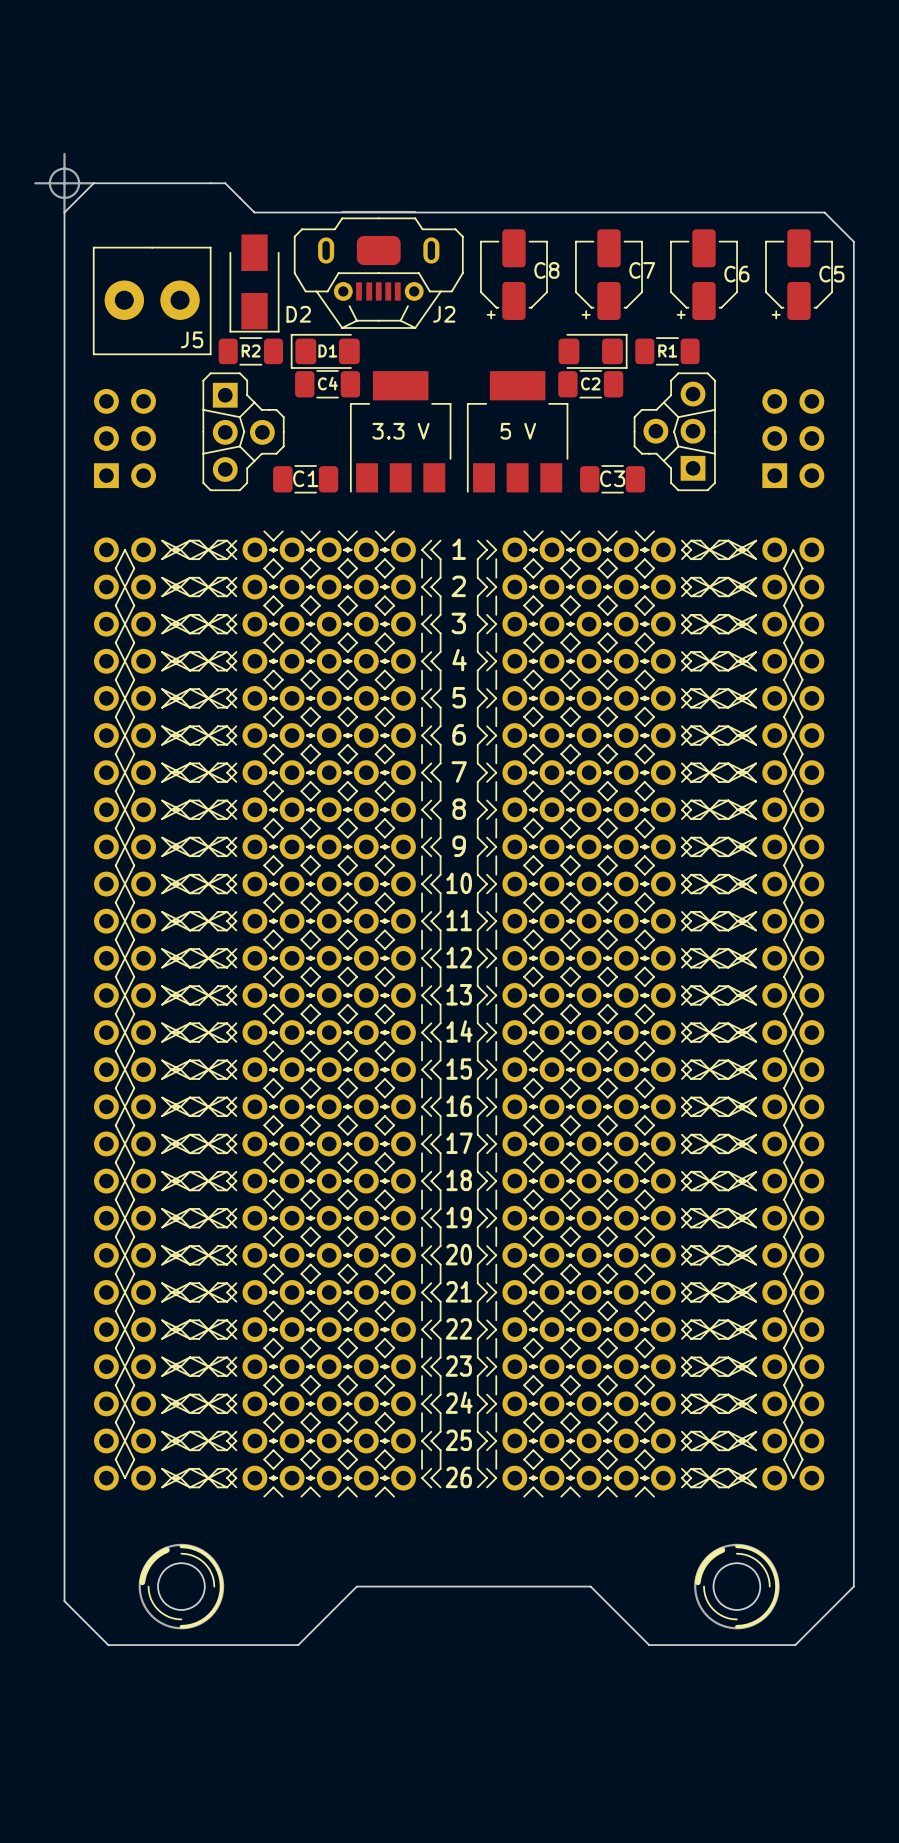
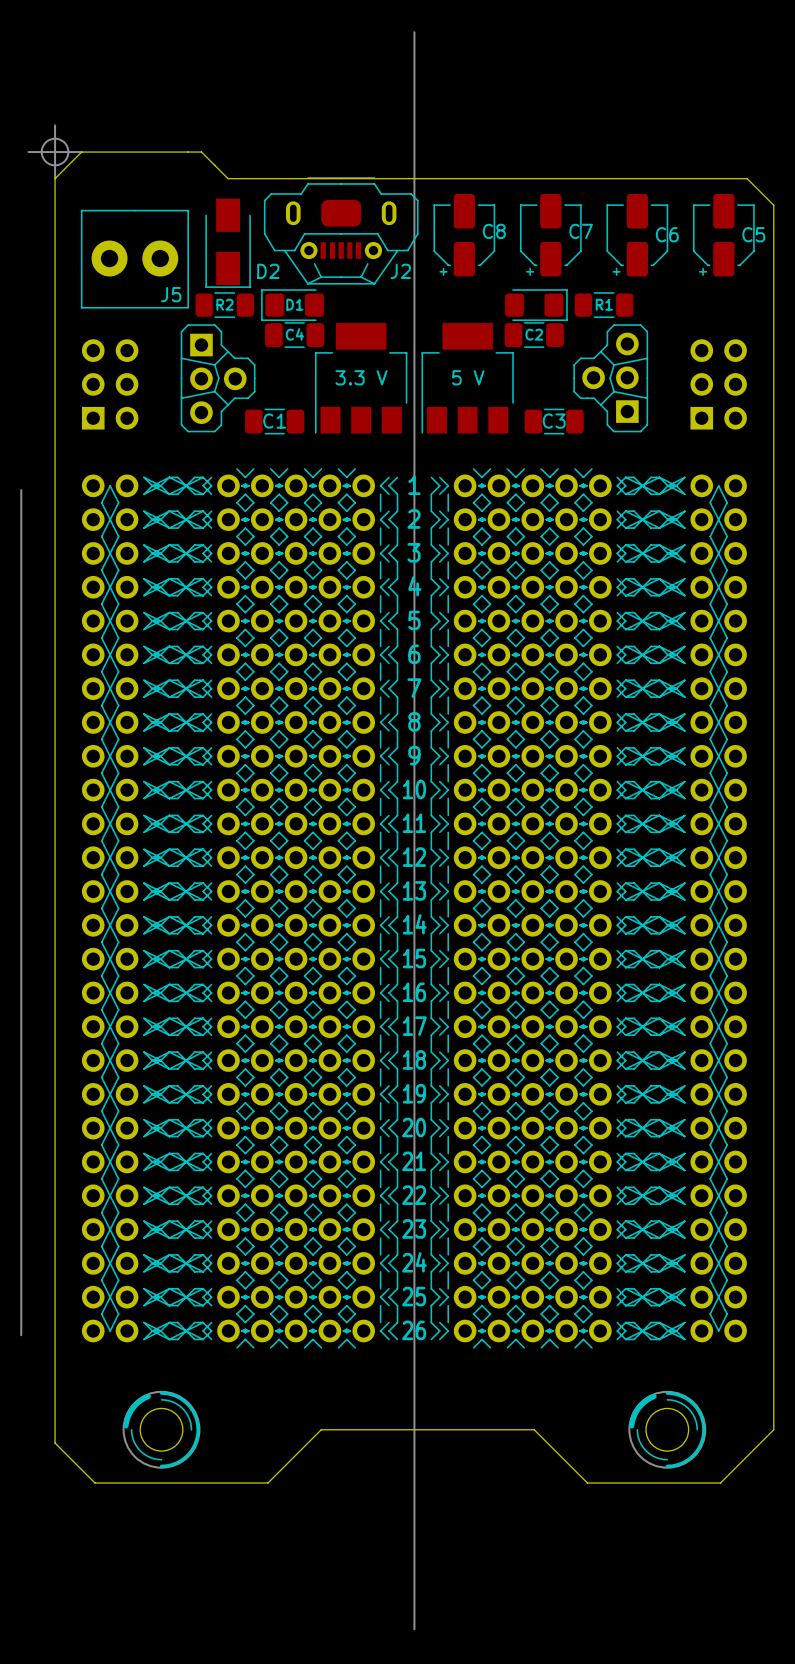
line: none -> (414, 32) (414, 1629)
line: none -> (21, 490) (21, 1335)

